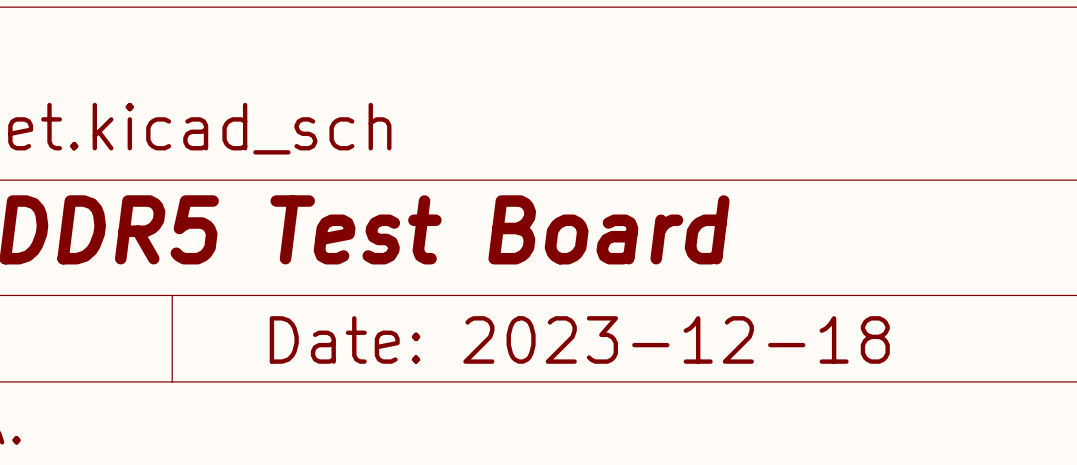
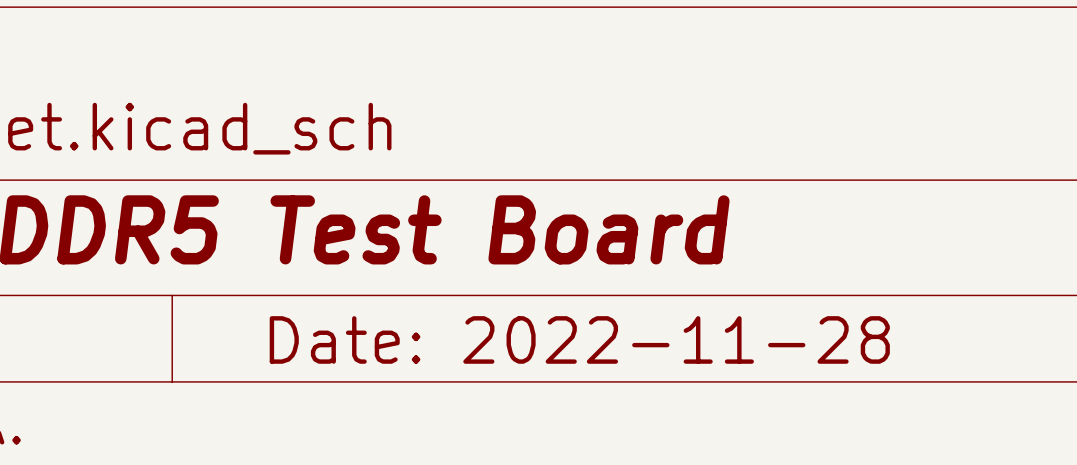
title block: Date: 2023-12-18 (579, 339) -> Date: 2022-11-28 (579, 339)

